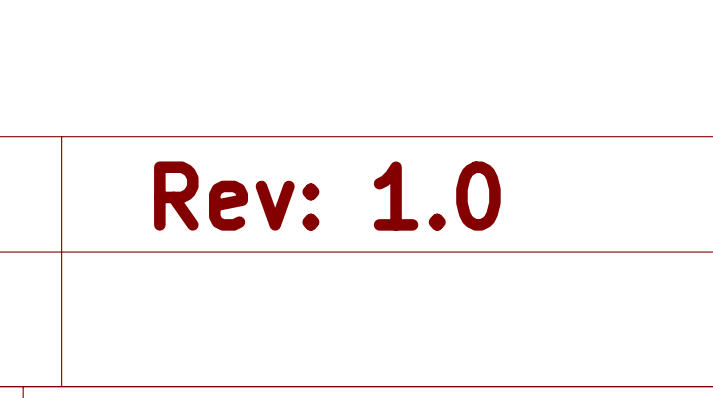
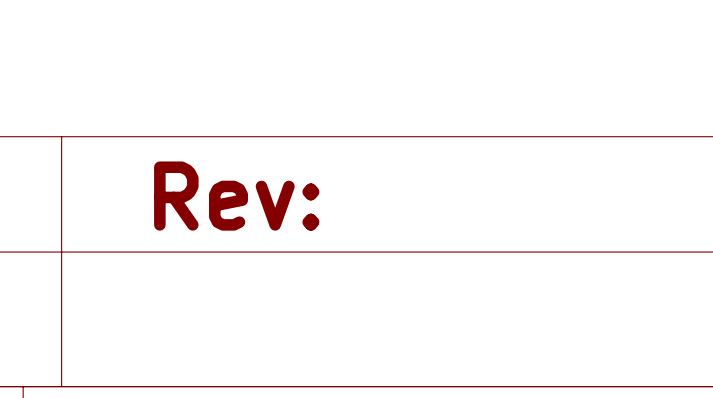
title block: Rev: 1.0 (327, 196) -> Rev: (236, 196)

